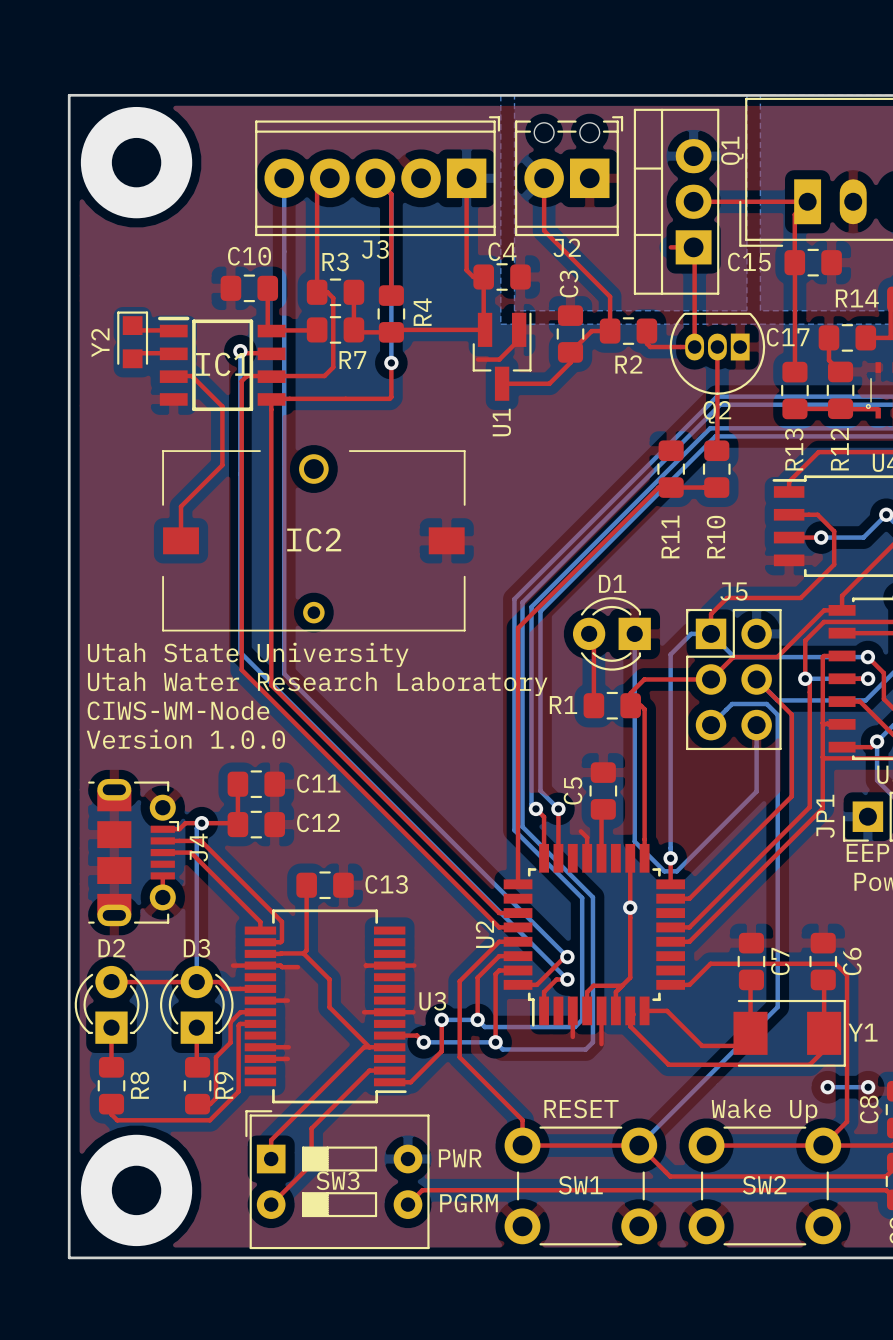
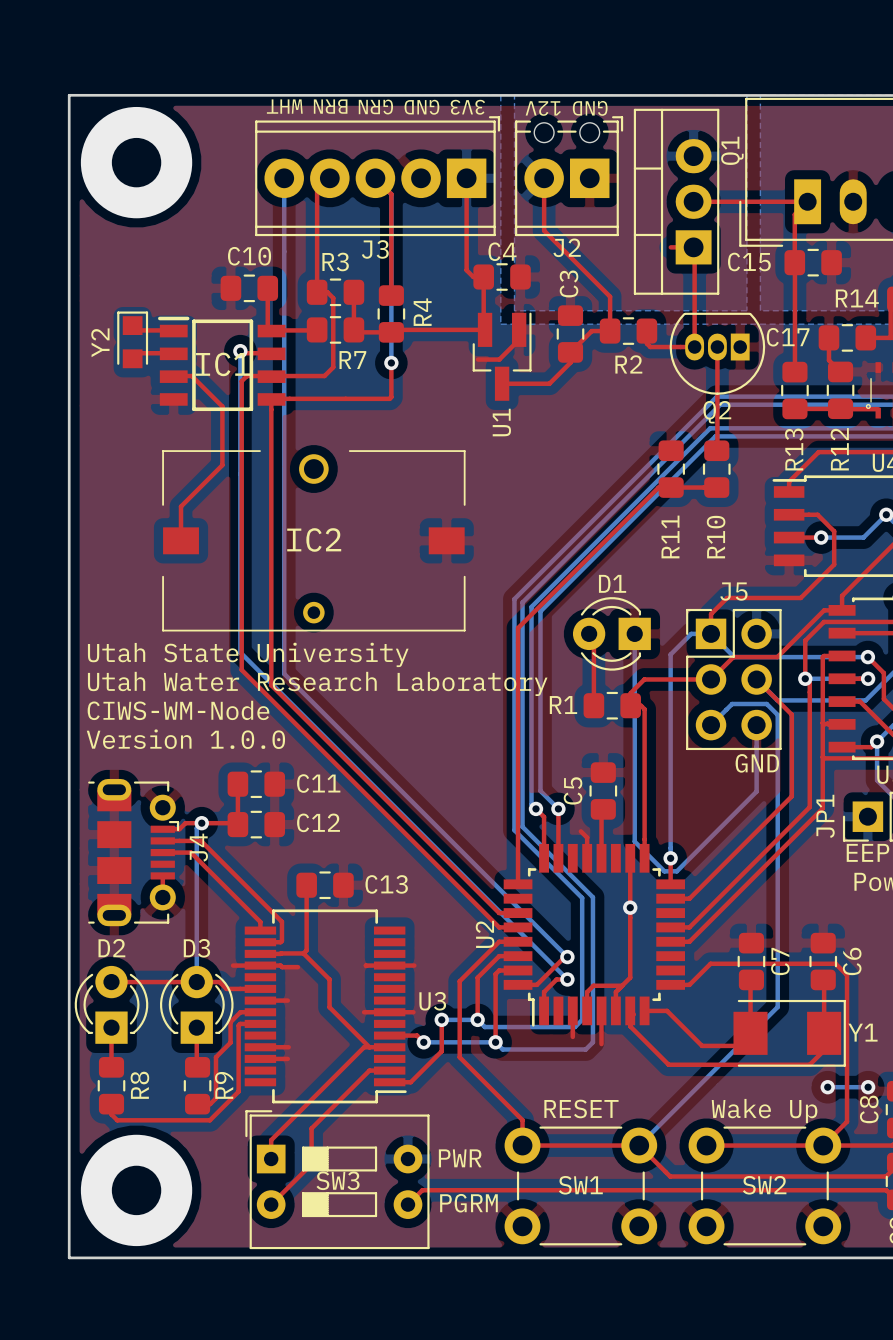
text: none -> WHT (284, 106)
text: none -> BRN (330, 106)
text: none -> GRN (375, 107)
text: none -> GND (421, 107)
text: none -> 3V3 (467, 107)
text: none -> 12V (543, 108)
text: none -> GND (590, 108)
text: none -> GND (757, 763)

